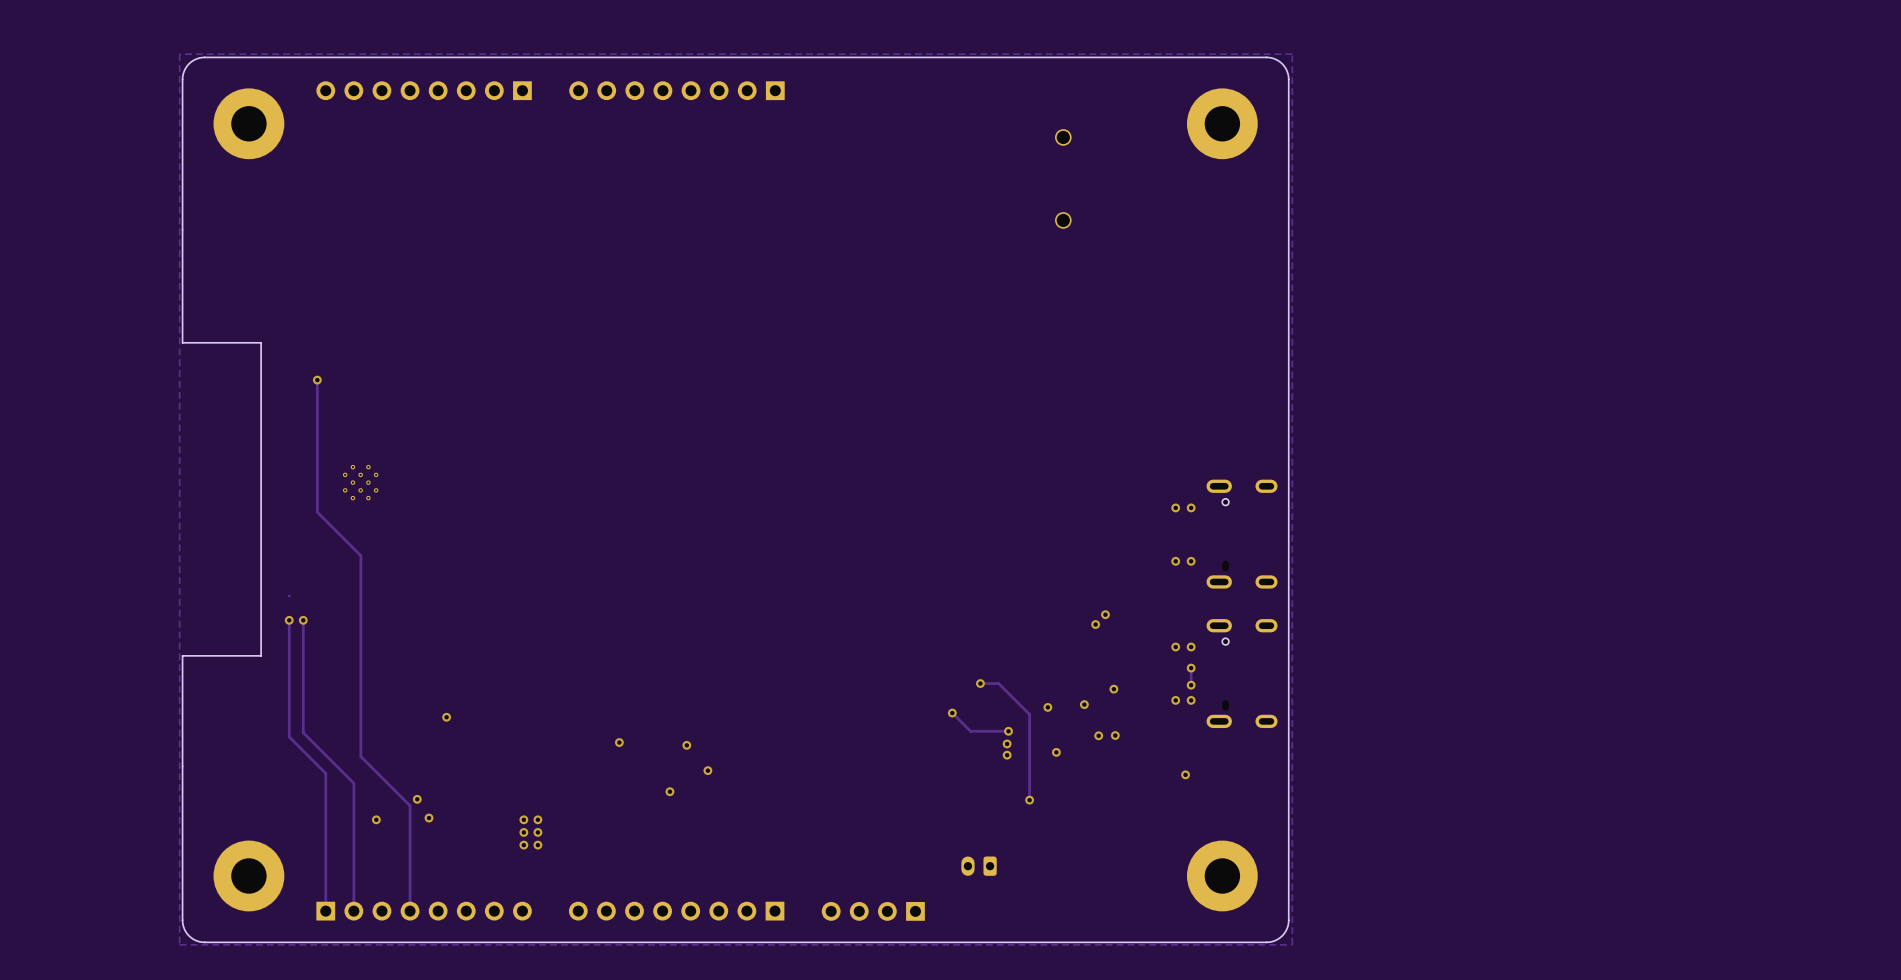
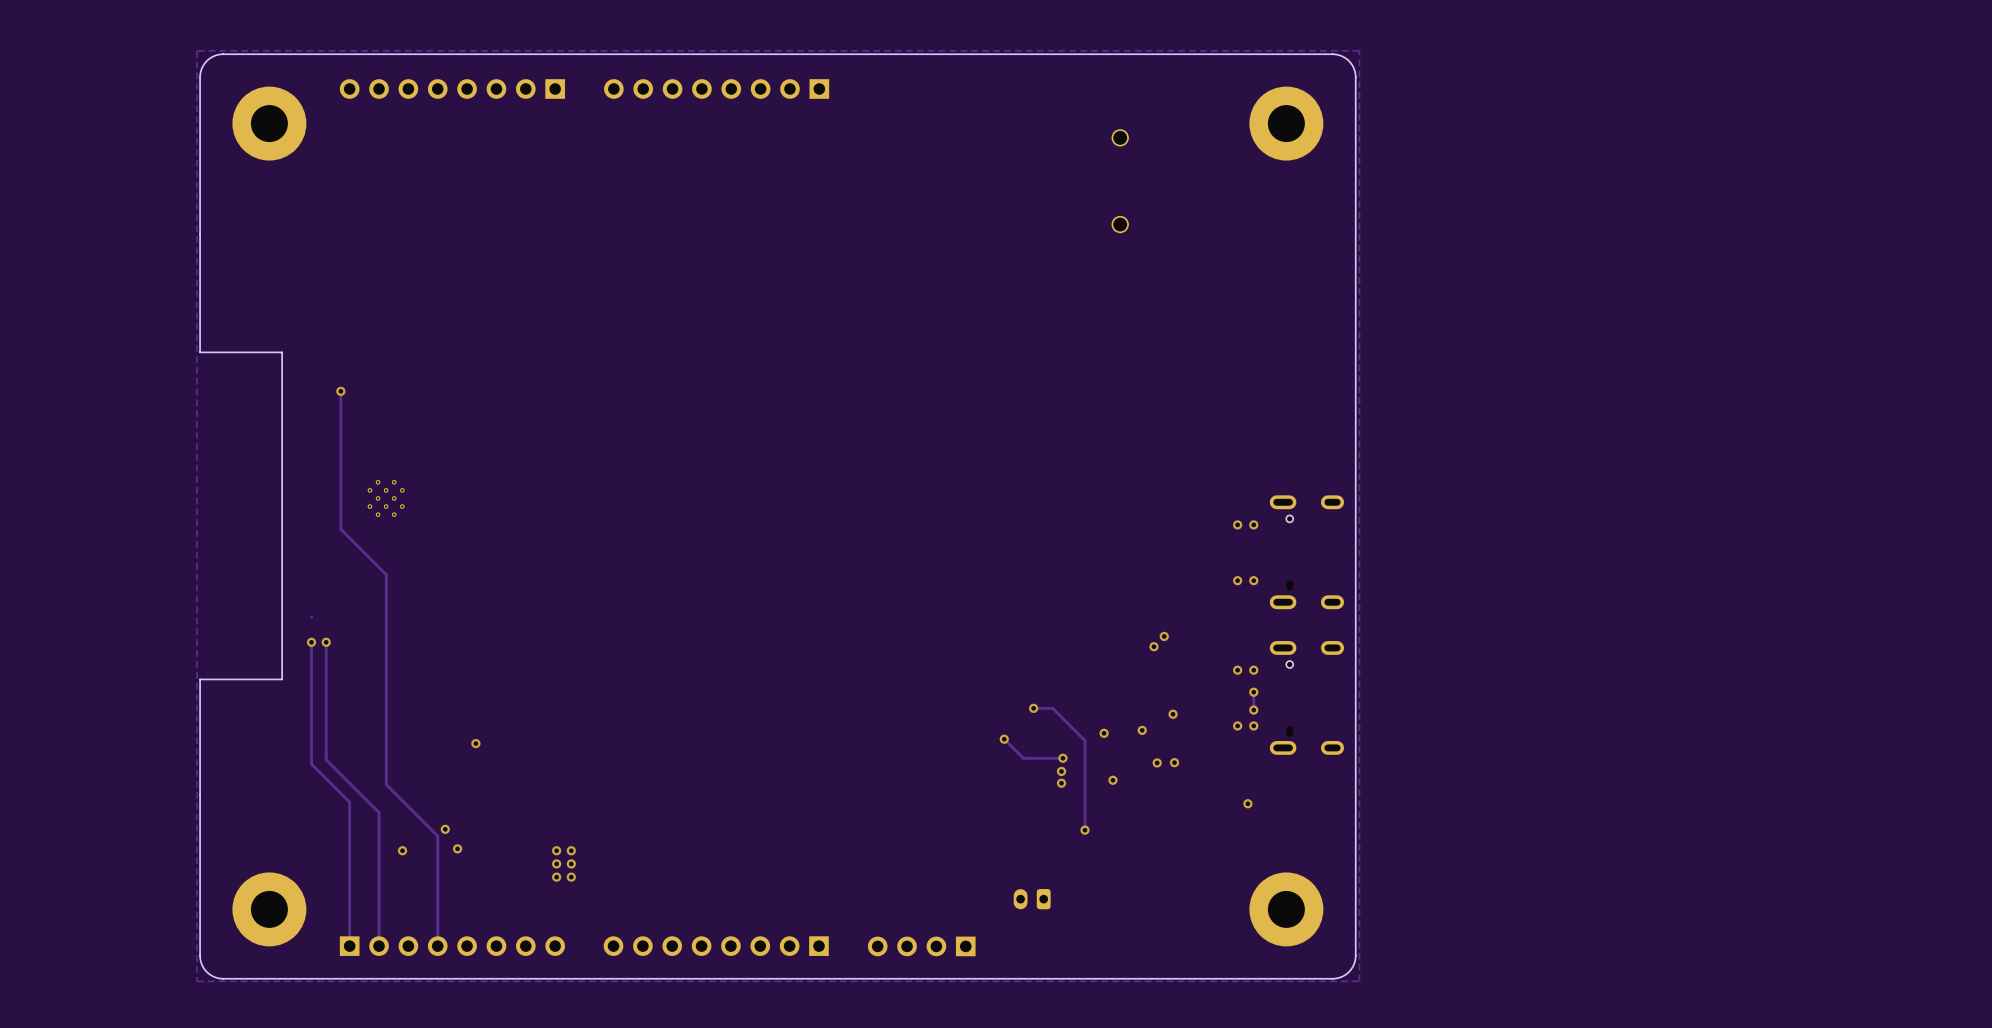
via: (619, 742) -> none
via: (686, 745) -> none
via: (707, 770) -> none
via: (669, 791) -> none

